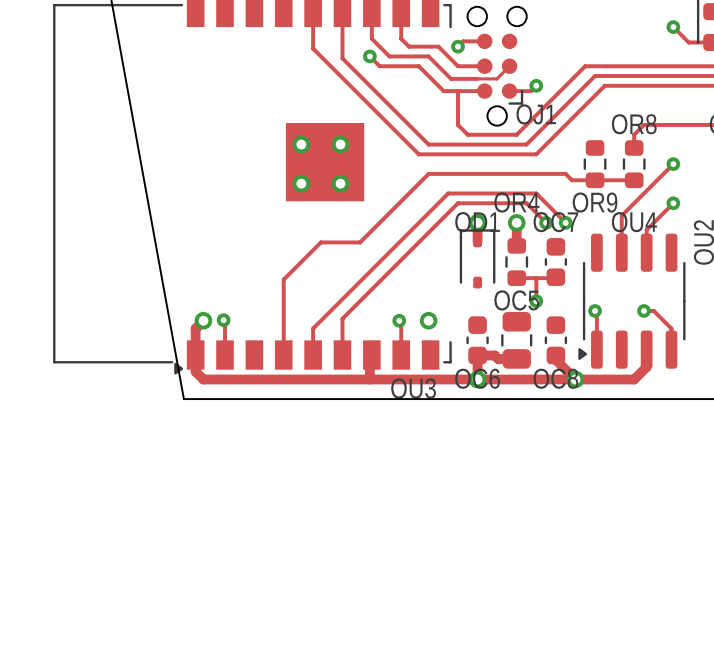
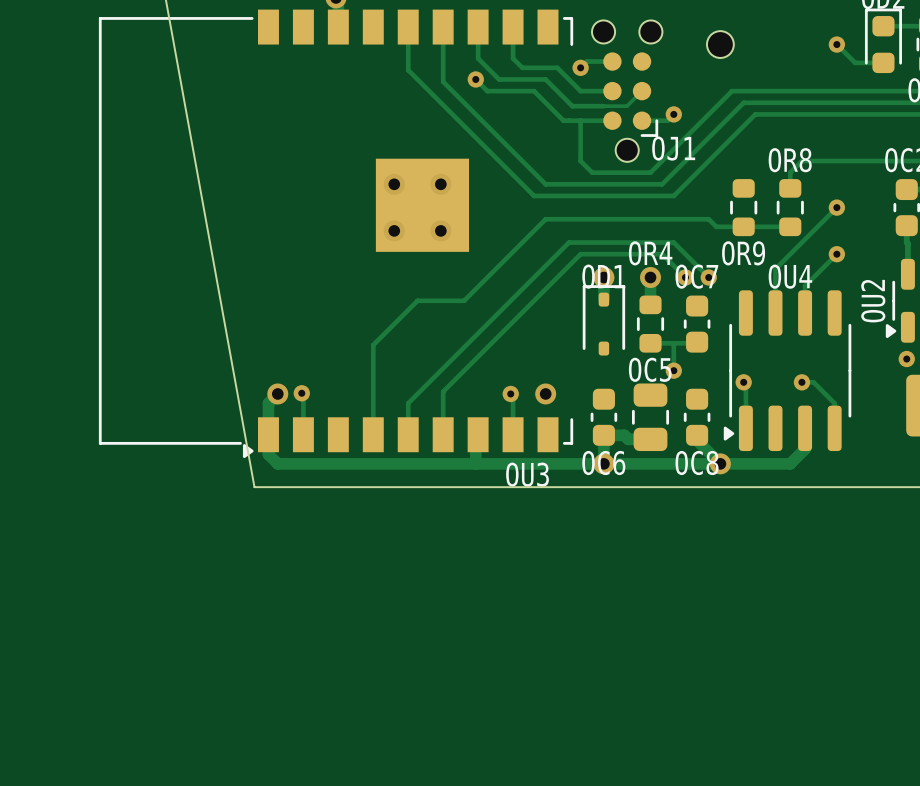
part: none -> (720, 44)

